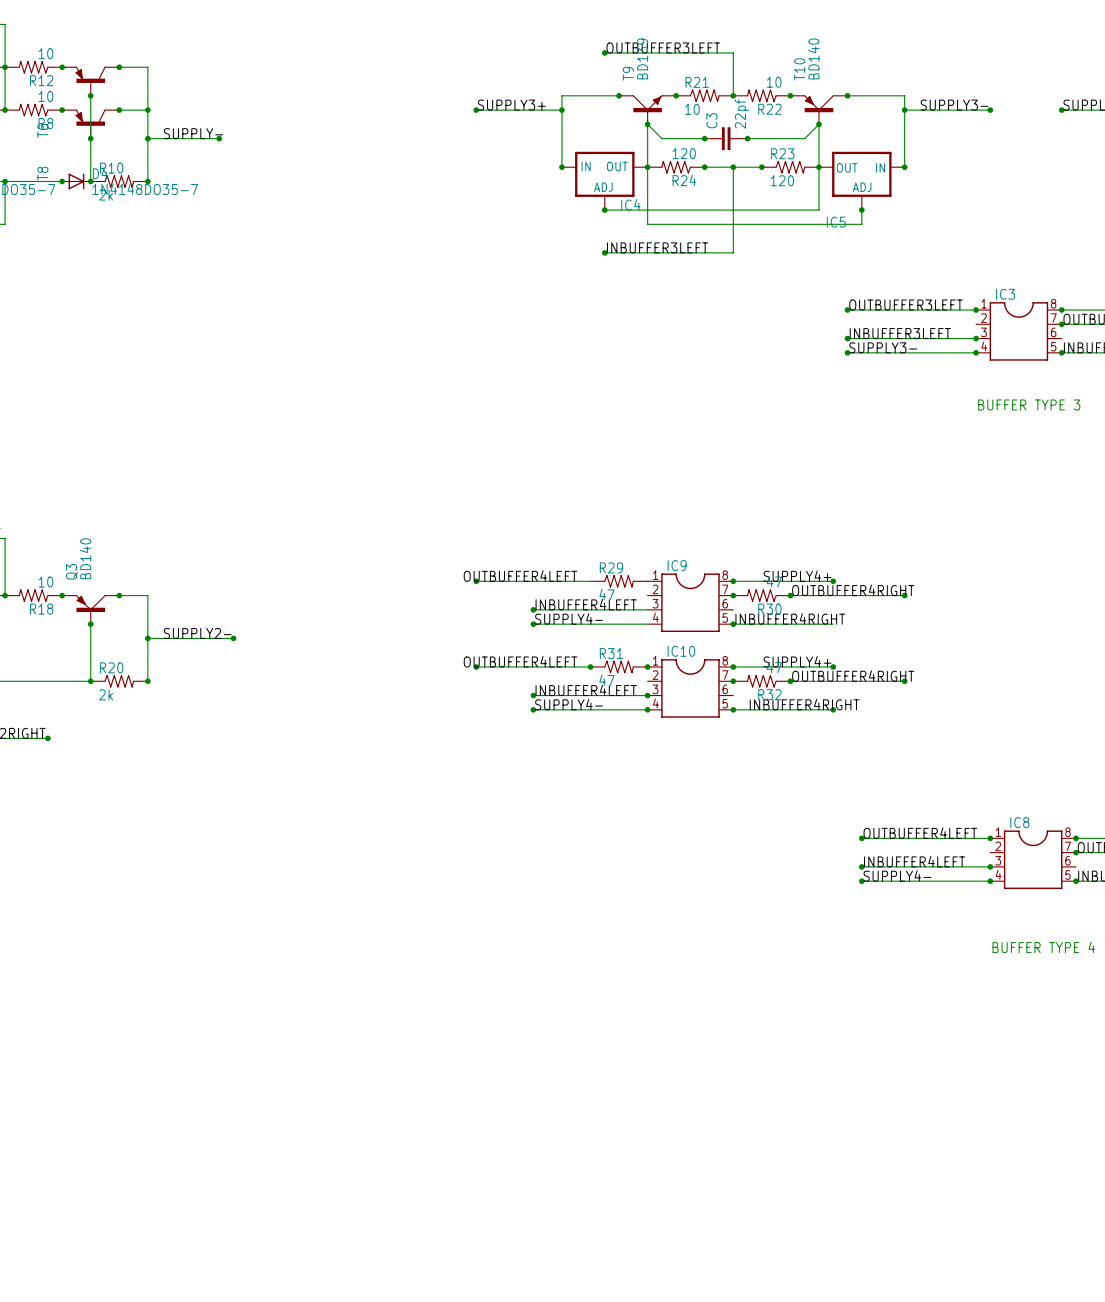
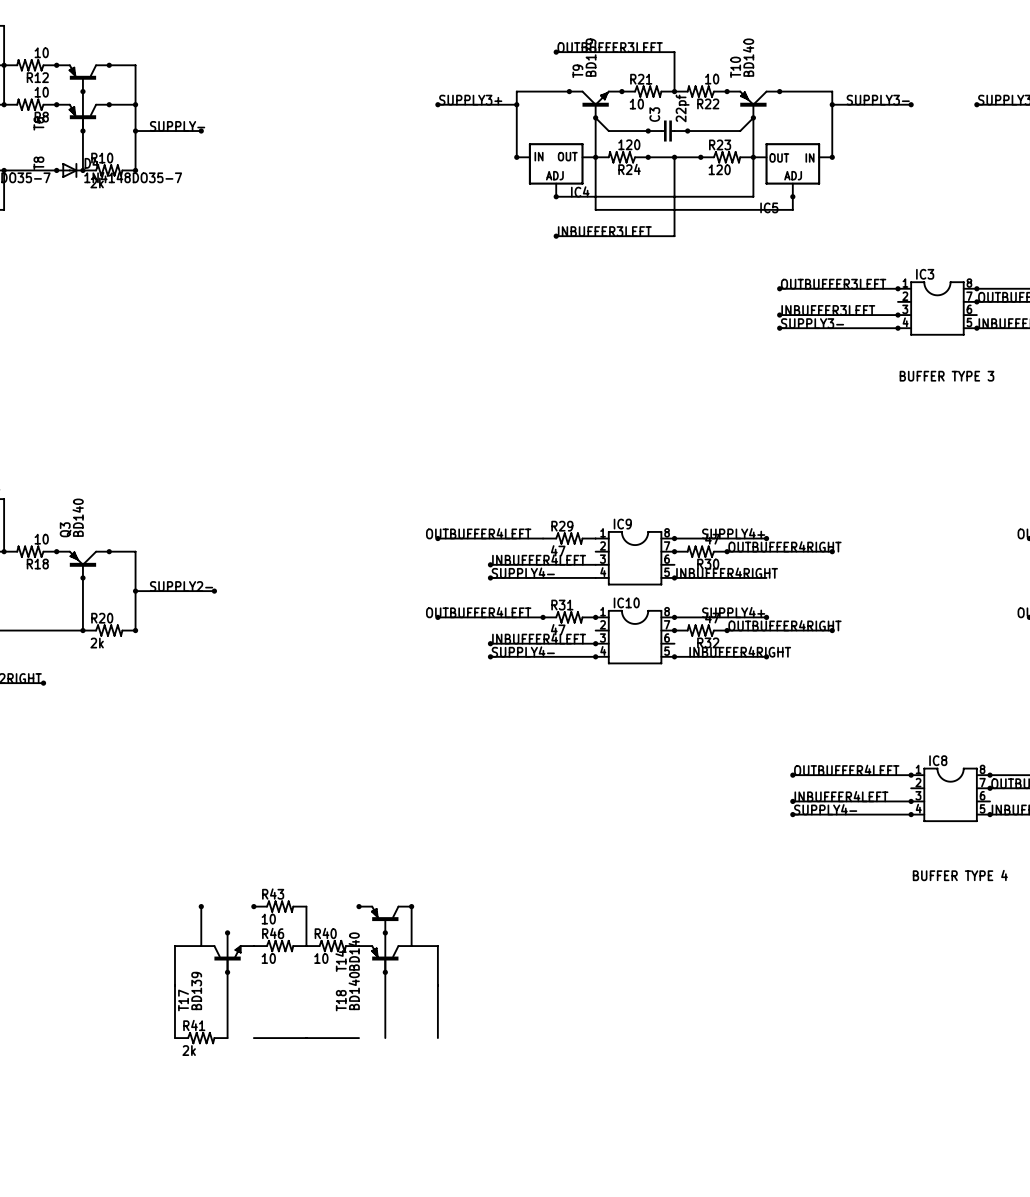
wire: none -> (201, 906) (201, 946) (174, 946) (174, 1038)
junction: none -> (201, 906)
junction: none -> (253, 906)
R43: none -> 10 (280, 906)
wire: none -> (306, 906) (306, 946)
junction: none -> (359, 906)
wire: none -> (411, 906) (411, 946) (437, 946) (437, 1038)
junction: none -> (411, 906)
T14: none -> BD140 (385, 919)
wire: none -> (227, 932) (227, 1038)
junction: none -> (227, 932)
wire: none -> (385, 932) (385, 1038)
junction: none -> (385, 932)
R46: none -> 10 (280, 946)
R40: none -> 10 (332, 946)
T17: none -> BD139 (227, 958)
T18: none -> BD140 (385, 958)
junction: none -> (227, 972)
junction: none -> (385, 972)
R41: none -> 2k (201, 1038)
wire: none -> (253, 1038) (359, 1038)

